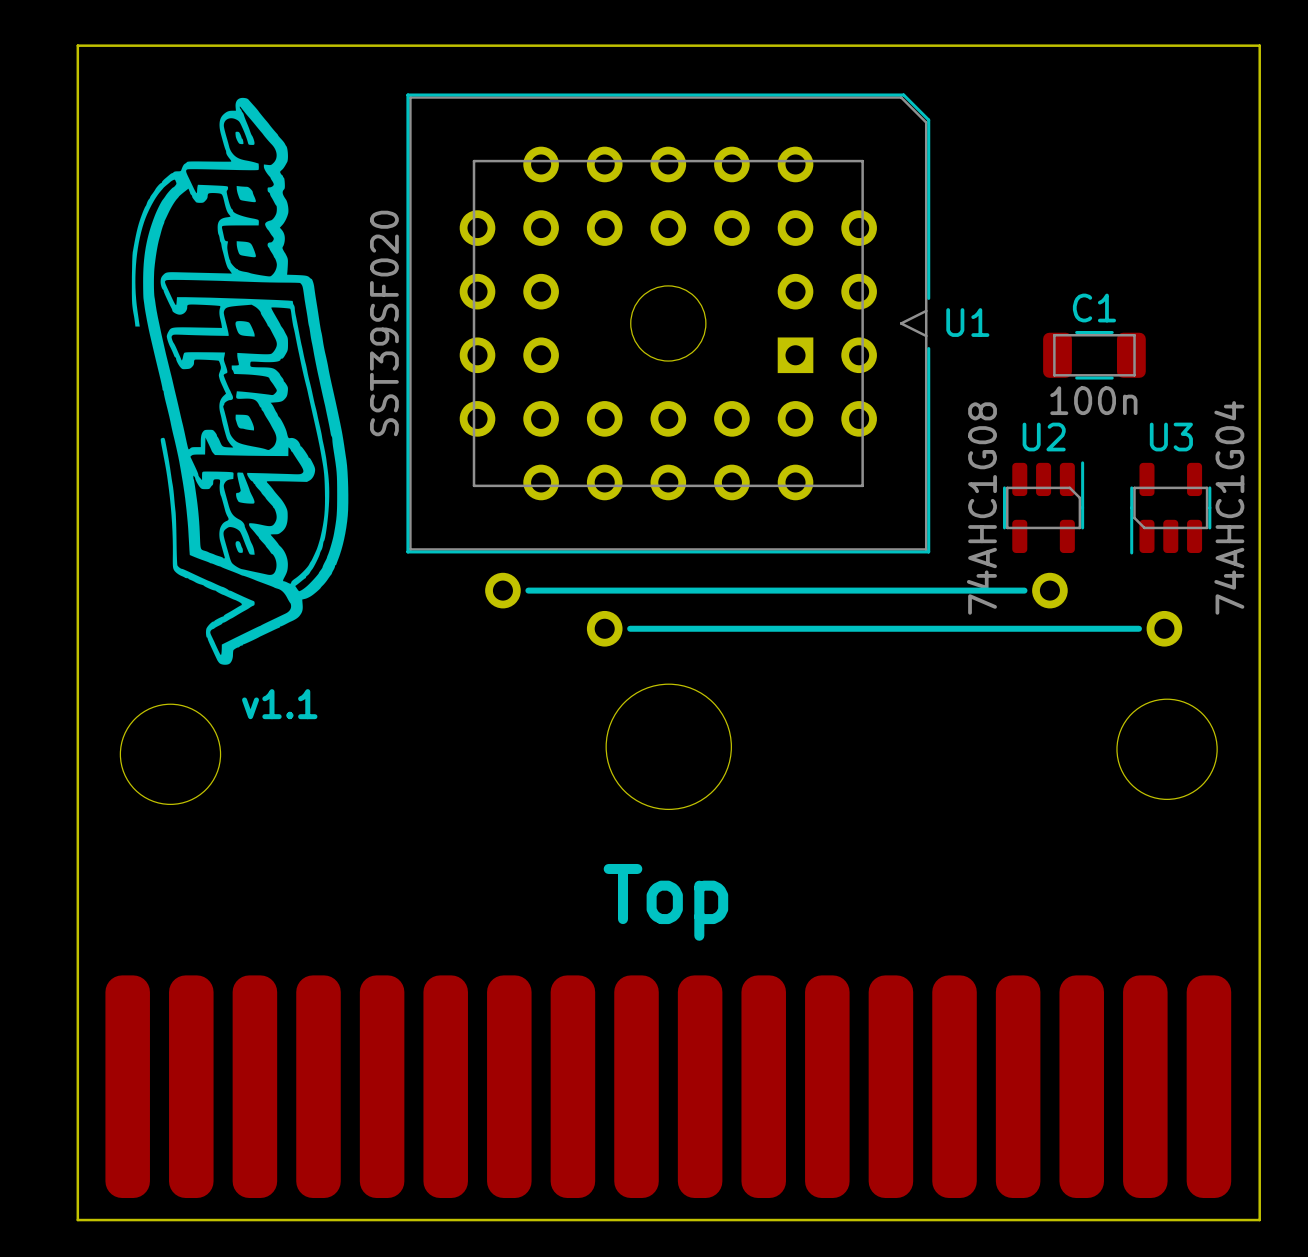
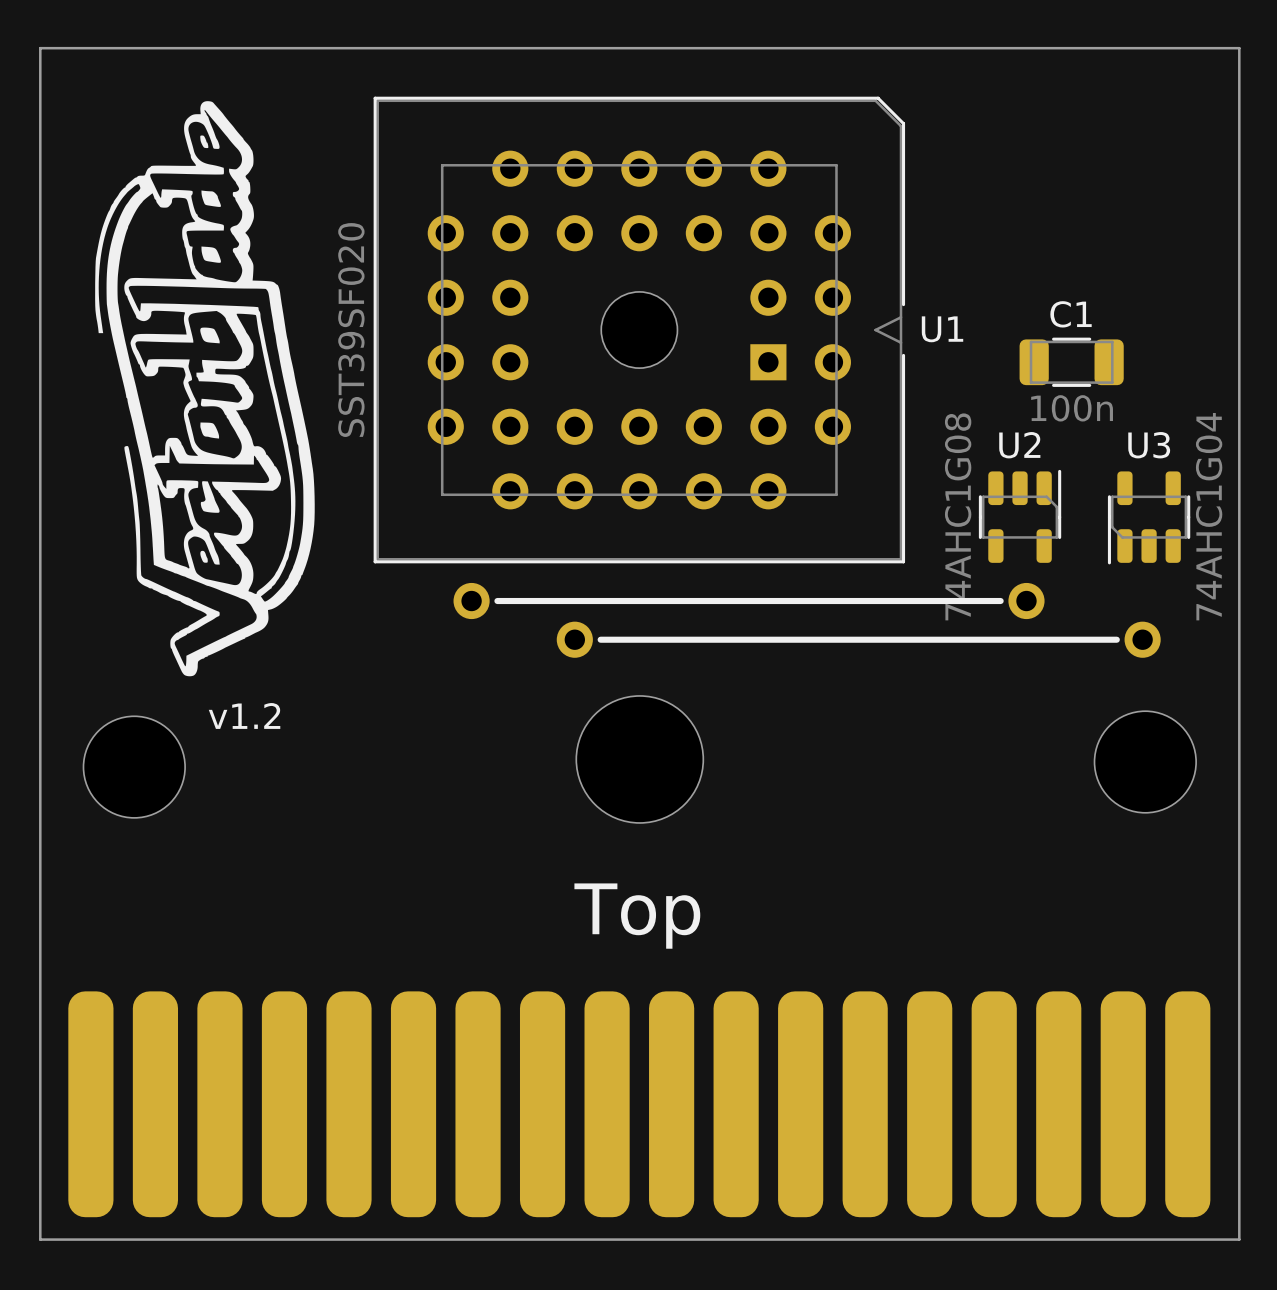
text: v1.1 (279, 704) -> v1.2 (244, 715)

